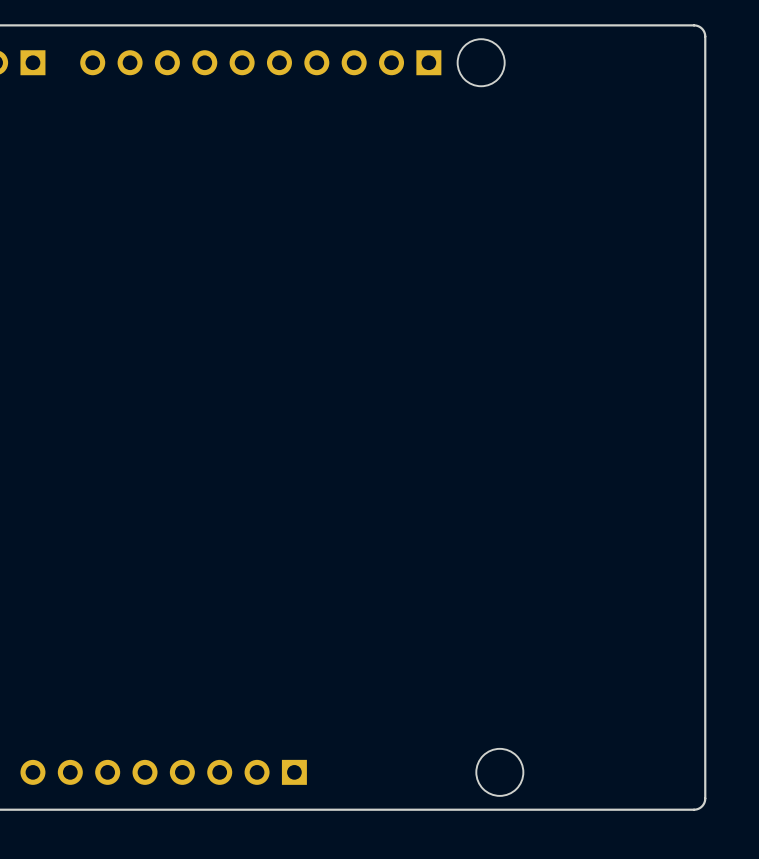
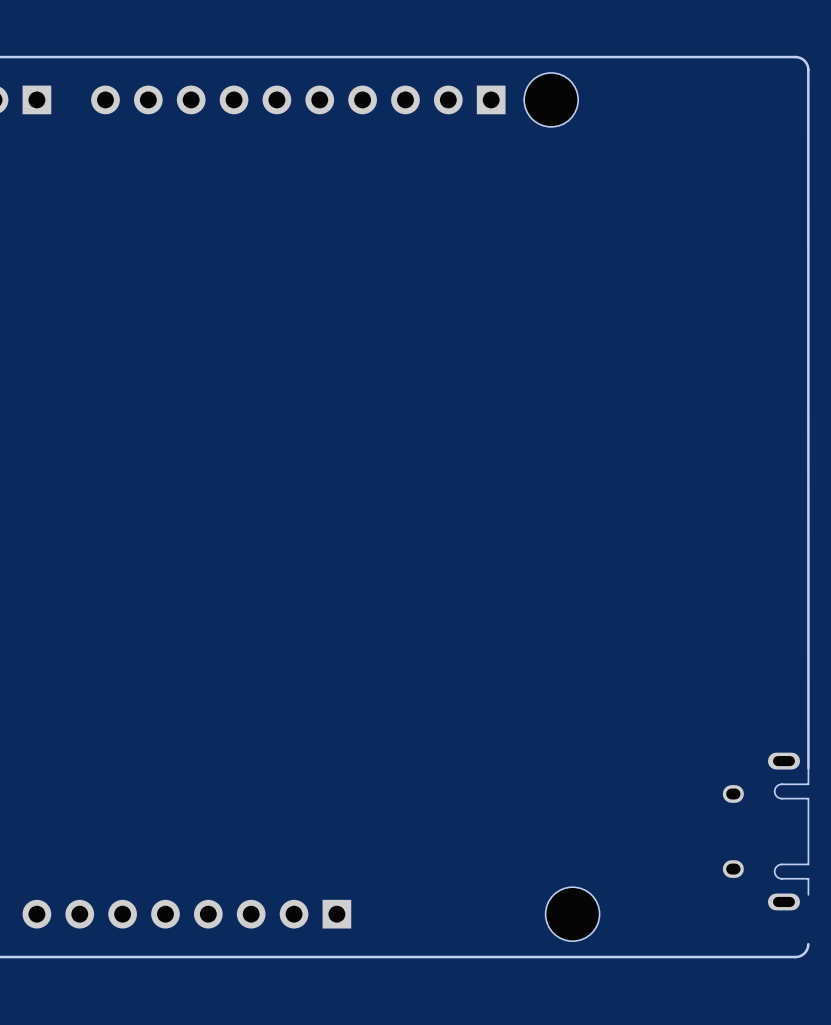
board edge: (705, 36) (705, 798) -> (808, 69) (808, 768)
part: none -> (766, 831)

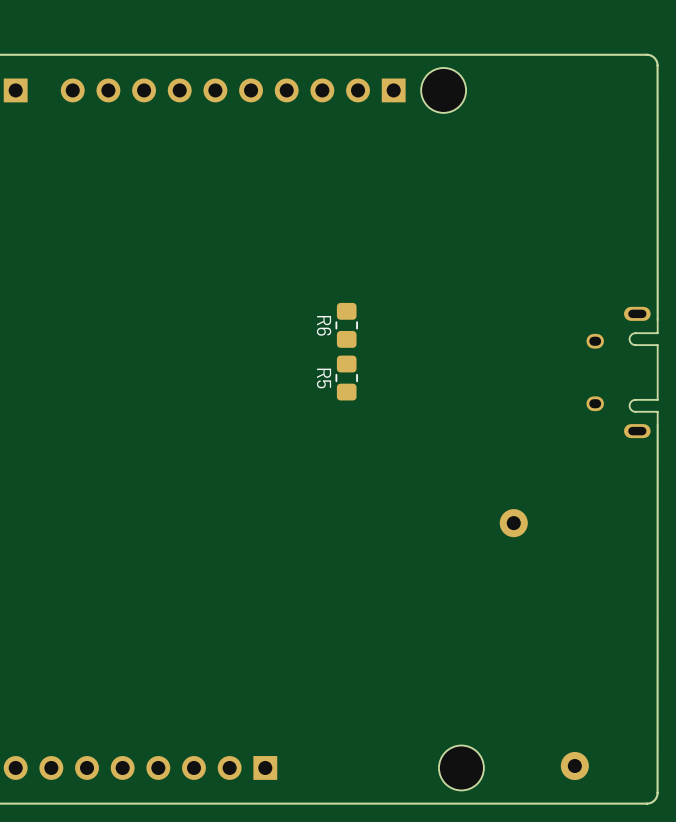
board edge: (808, 69) (808, 768) -> (657, 65) (657, 319)
R6: none -> (346, 325)
R5: none -> (346, 378)
board edge: none -> (657, 425) (657, 792)
part: none -> (513, 523)
part position: (766, 831) -> (622, 372)
part: none -> (574, 766)

